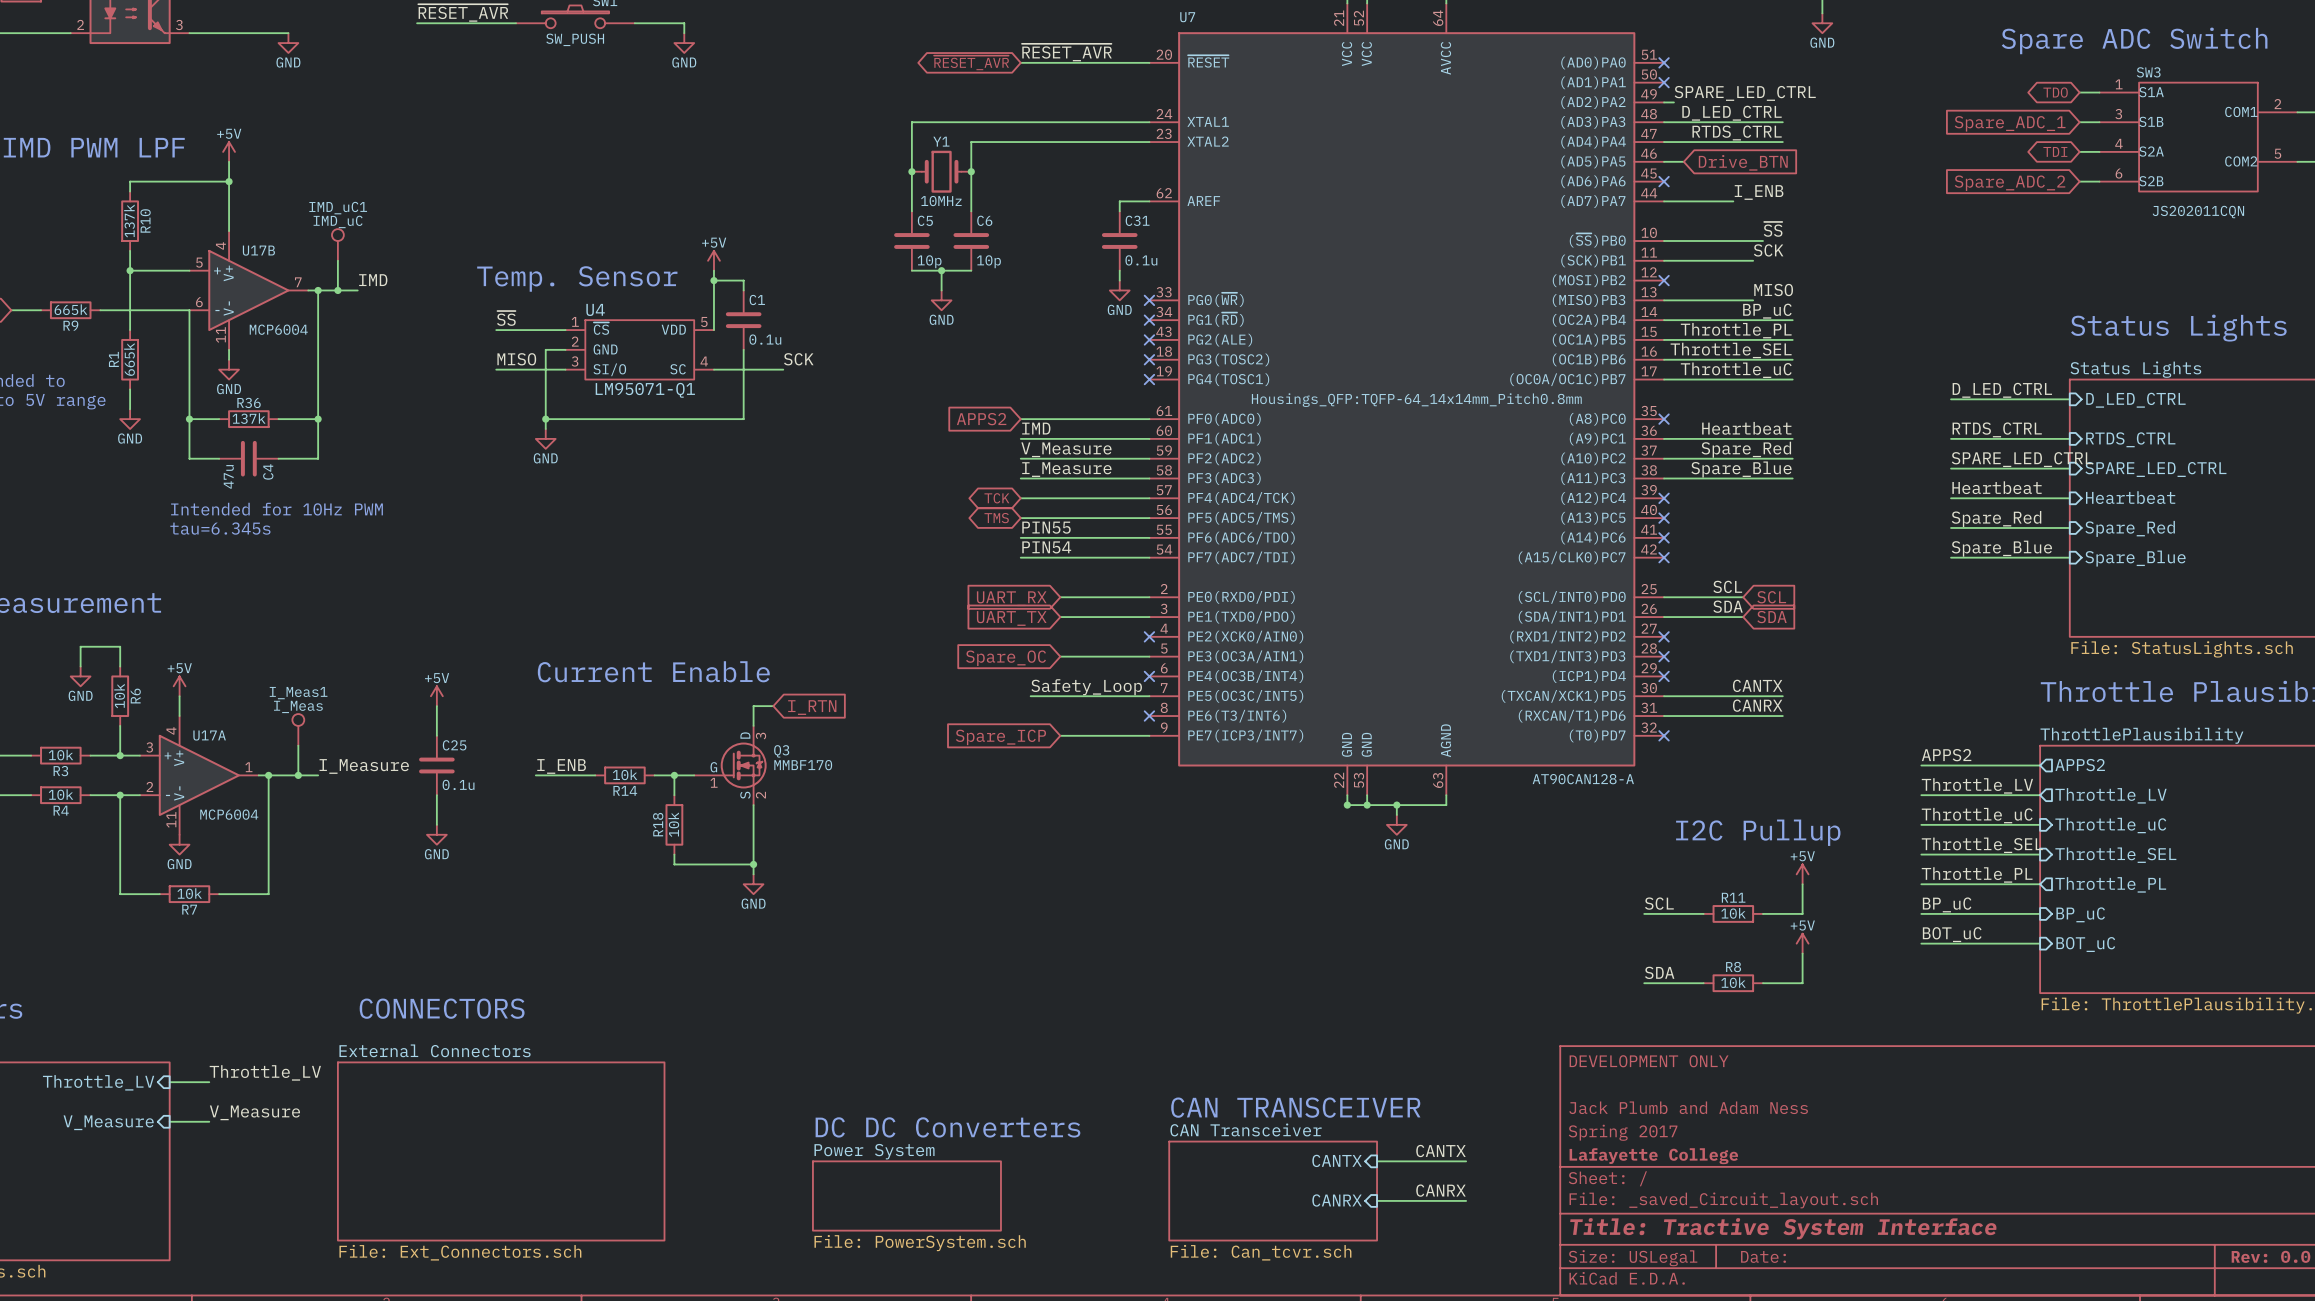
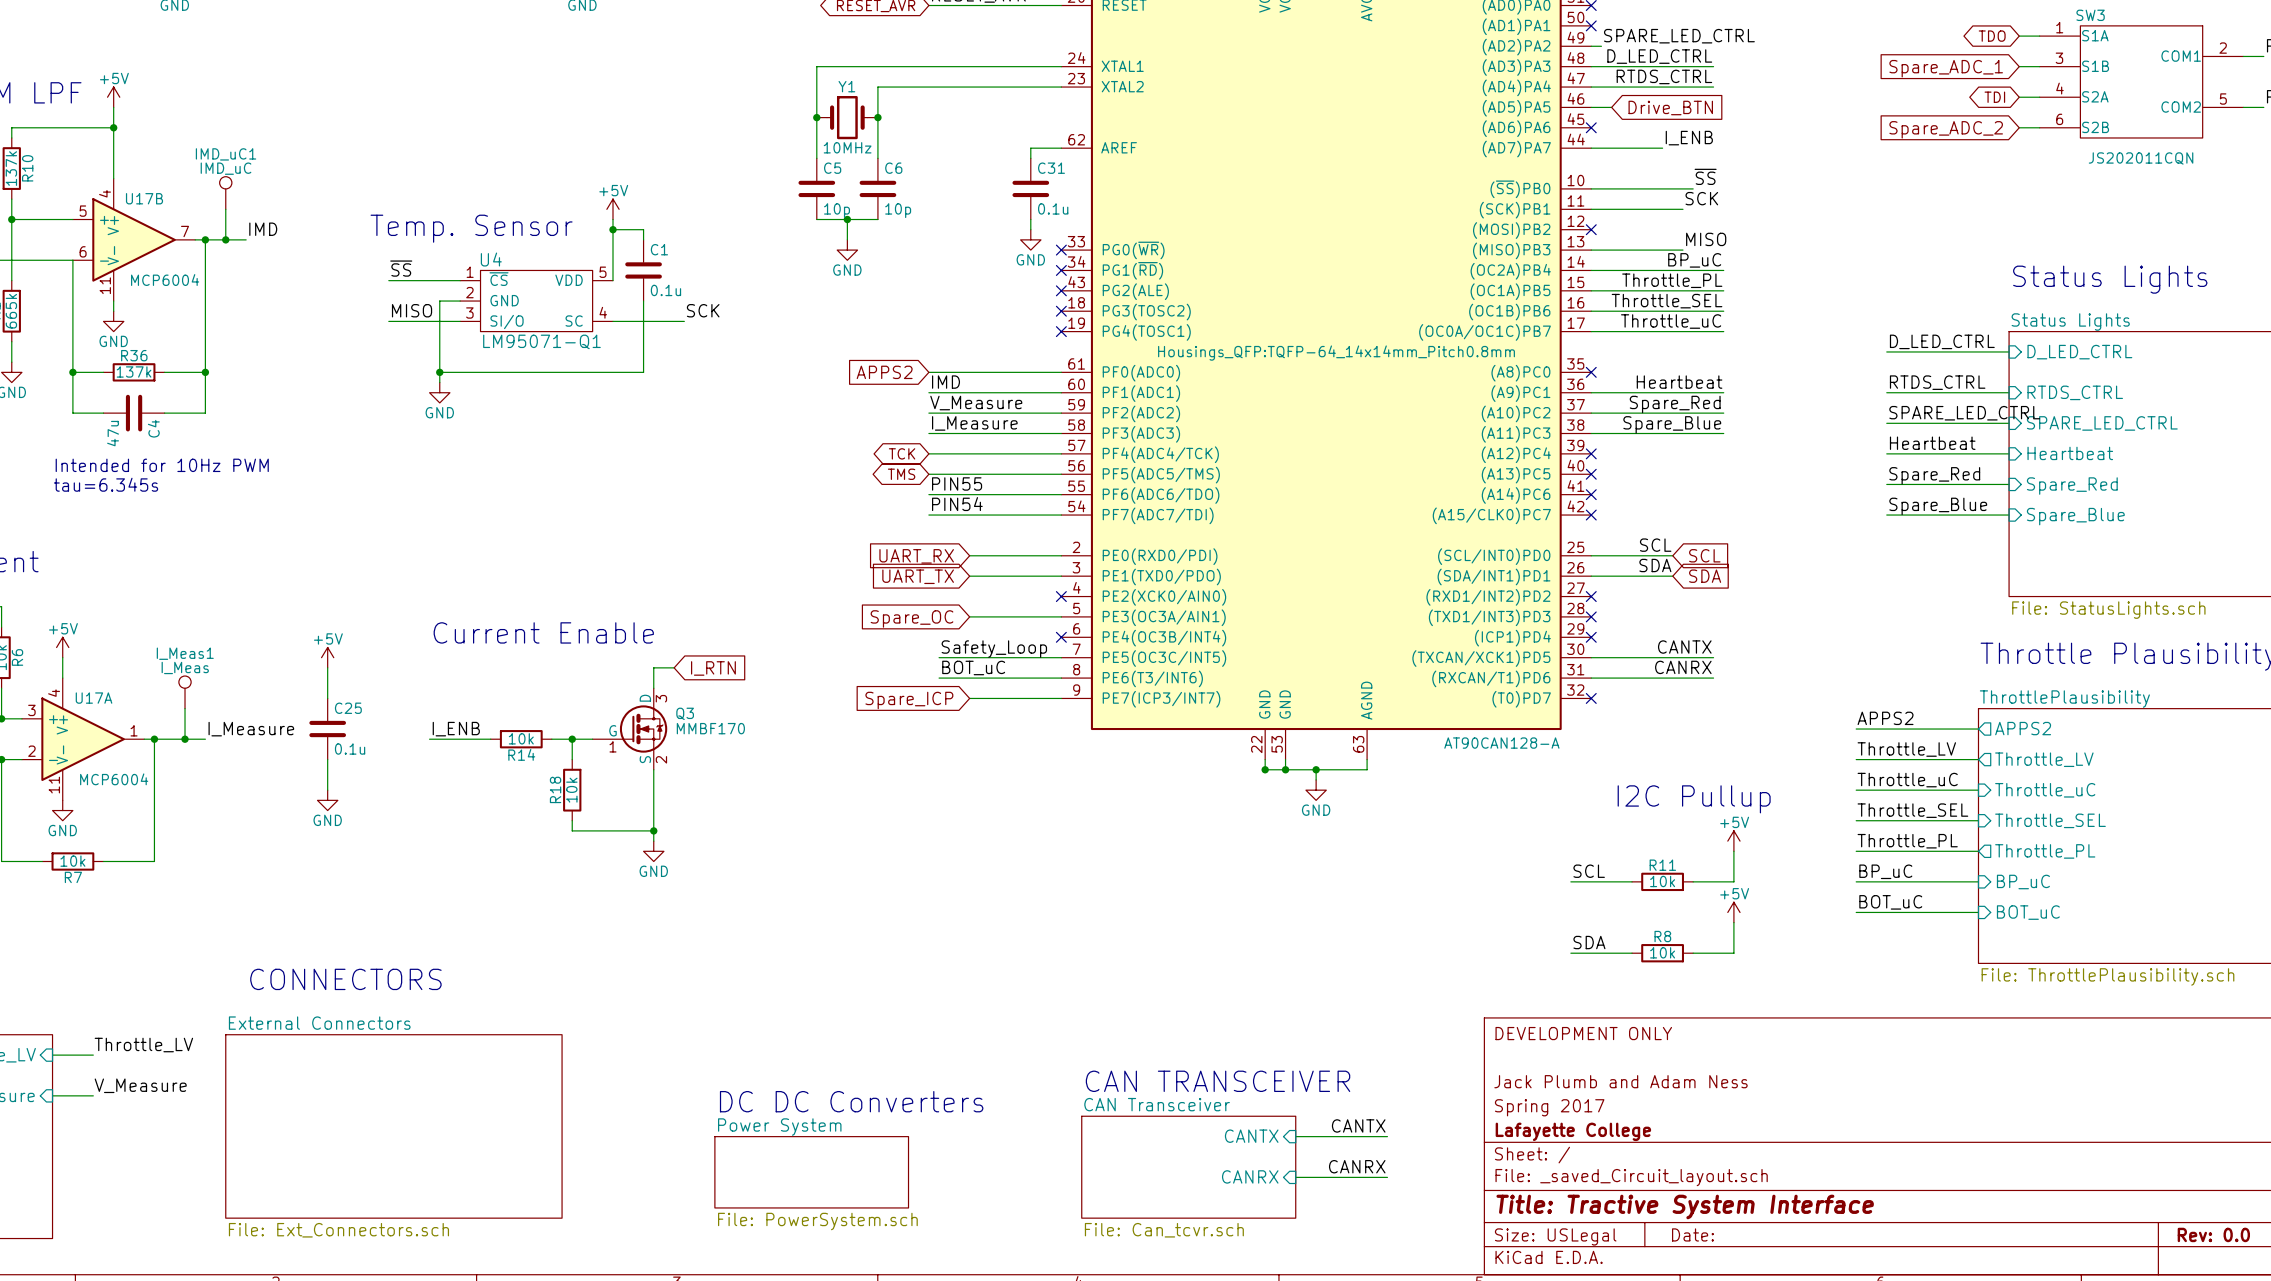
label: none -> BOT_uC (973, 667)
wire: none -> (939, 678) (1061, 678)
no-connect mark: (1149, 716) -> none

